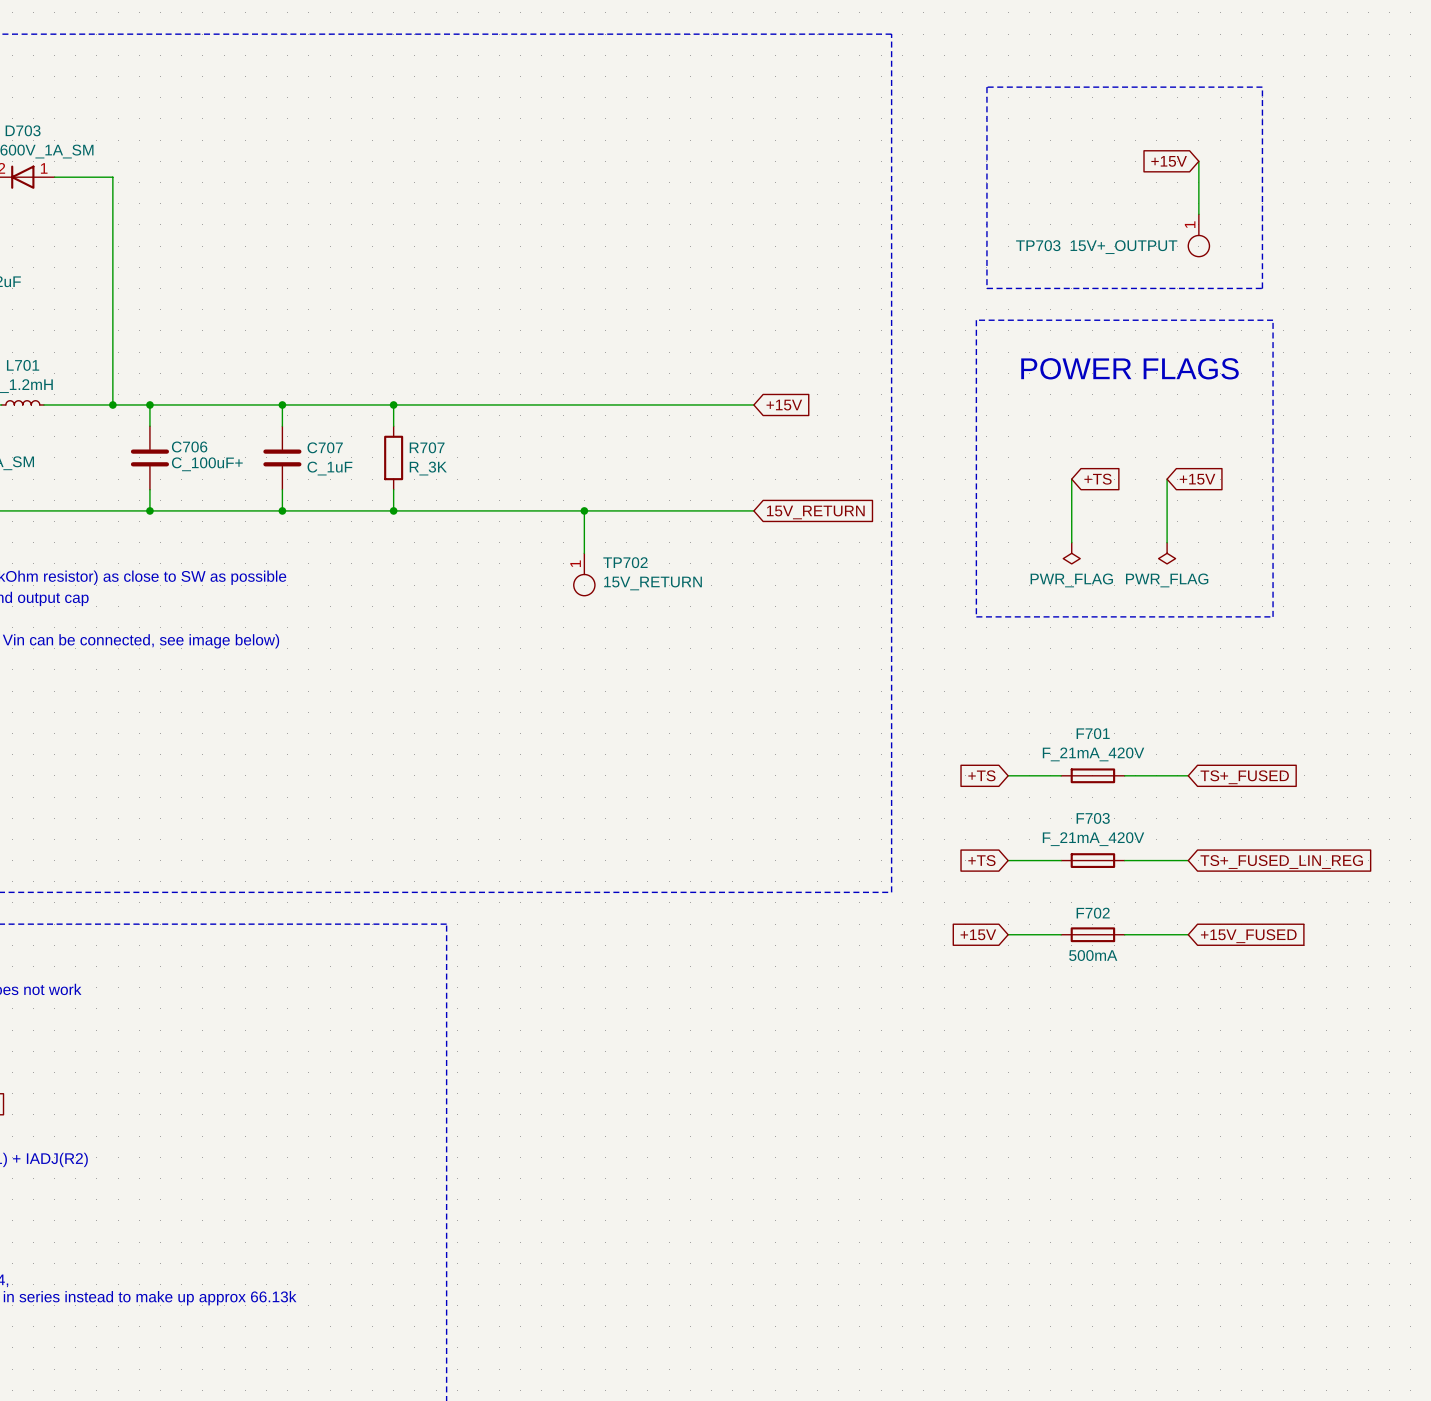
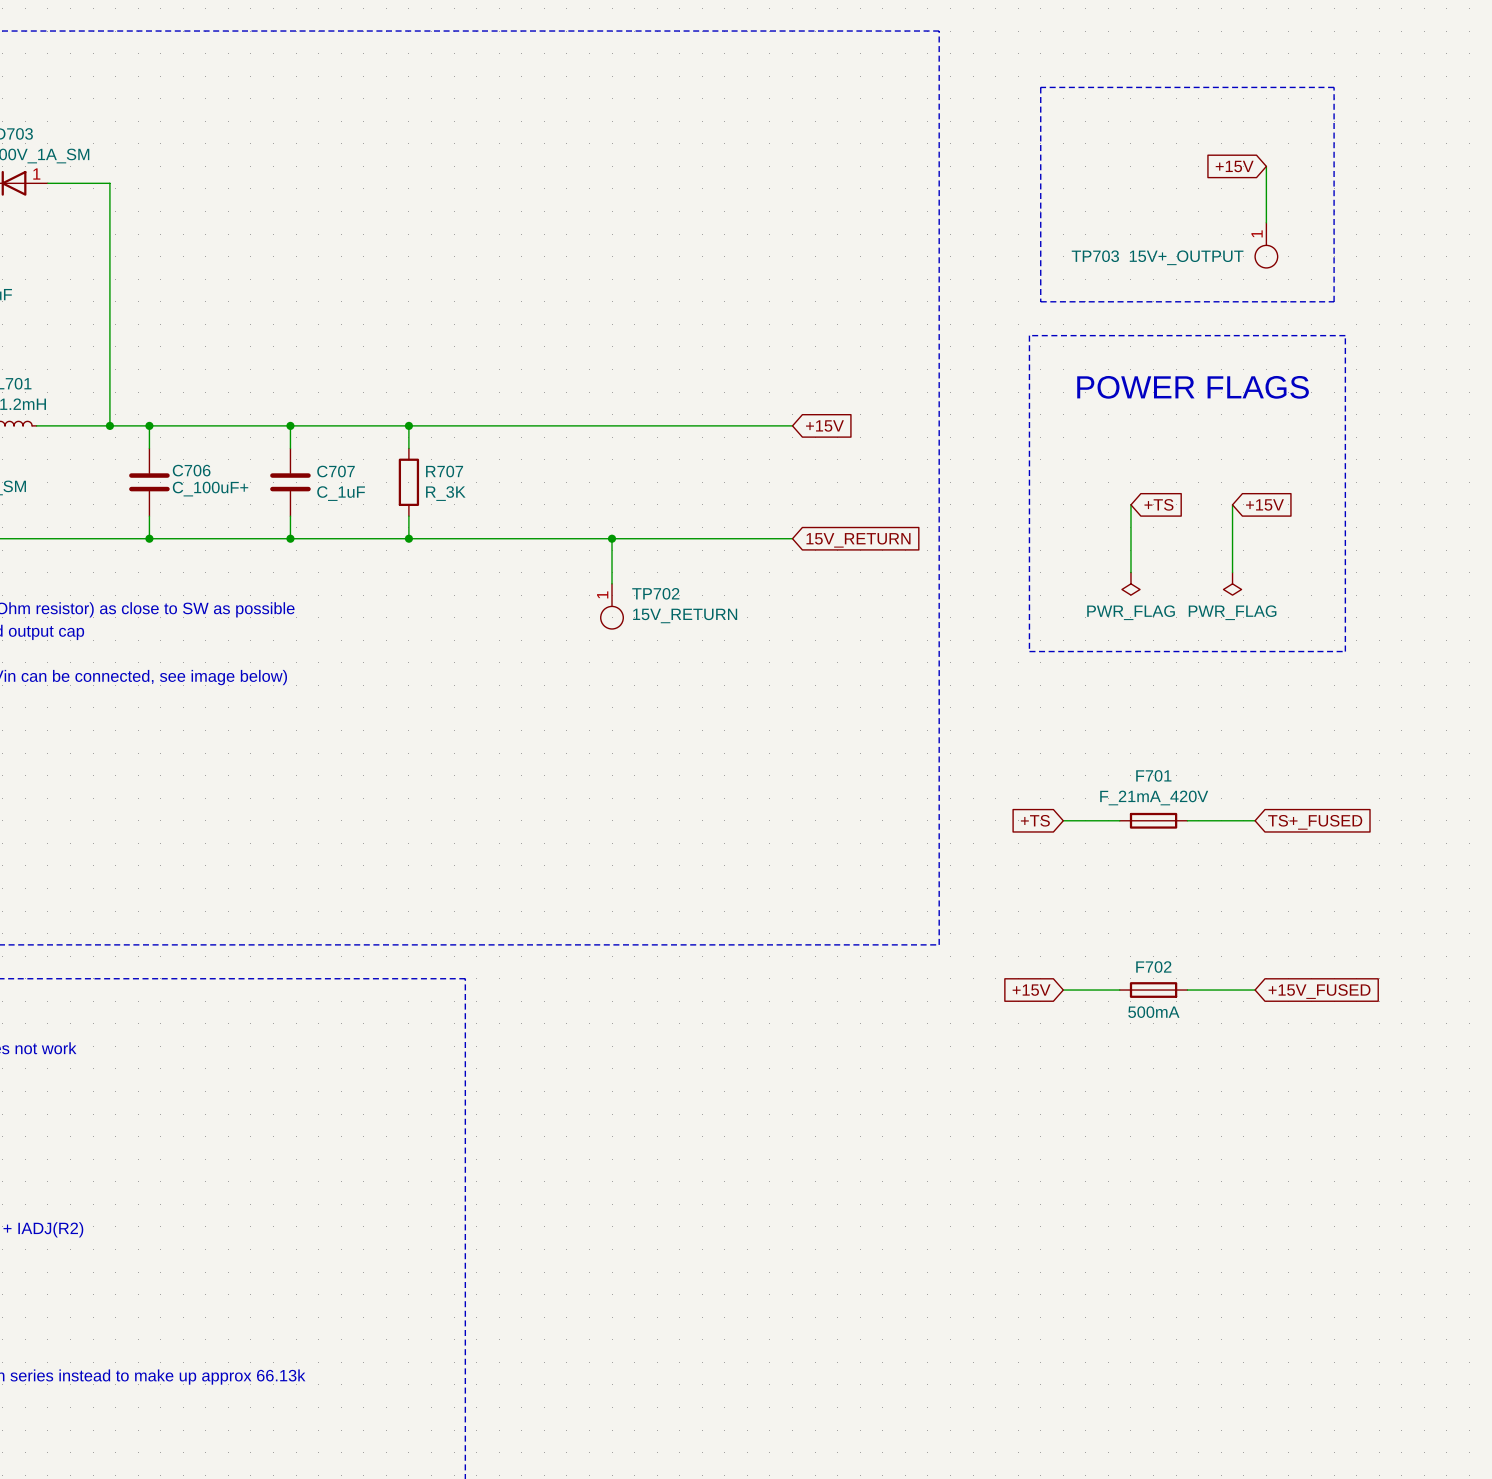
global label: +TS (981, 860) -> none
wire: (1008, 860) (1061, 860) -> none
F703: F_21mA_420V (1092, 860) -> none
wire: (1124, 860) (1188, 860) -> none
global label: TS+_FUSED_LIN_REG (1281, 862) -> none

